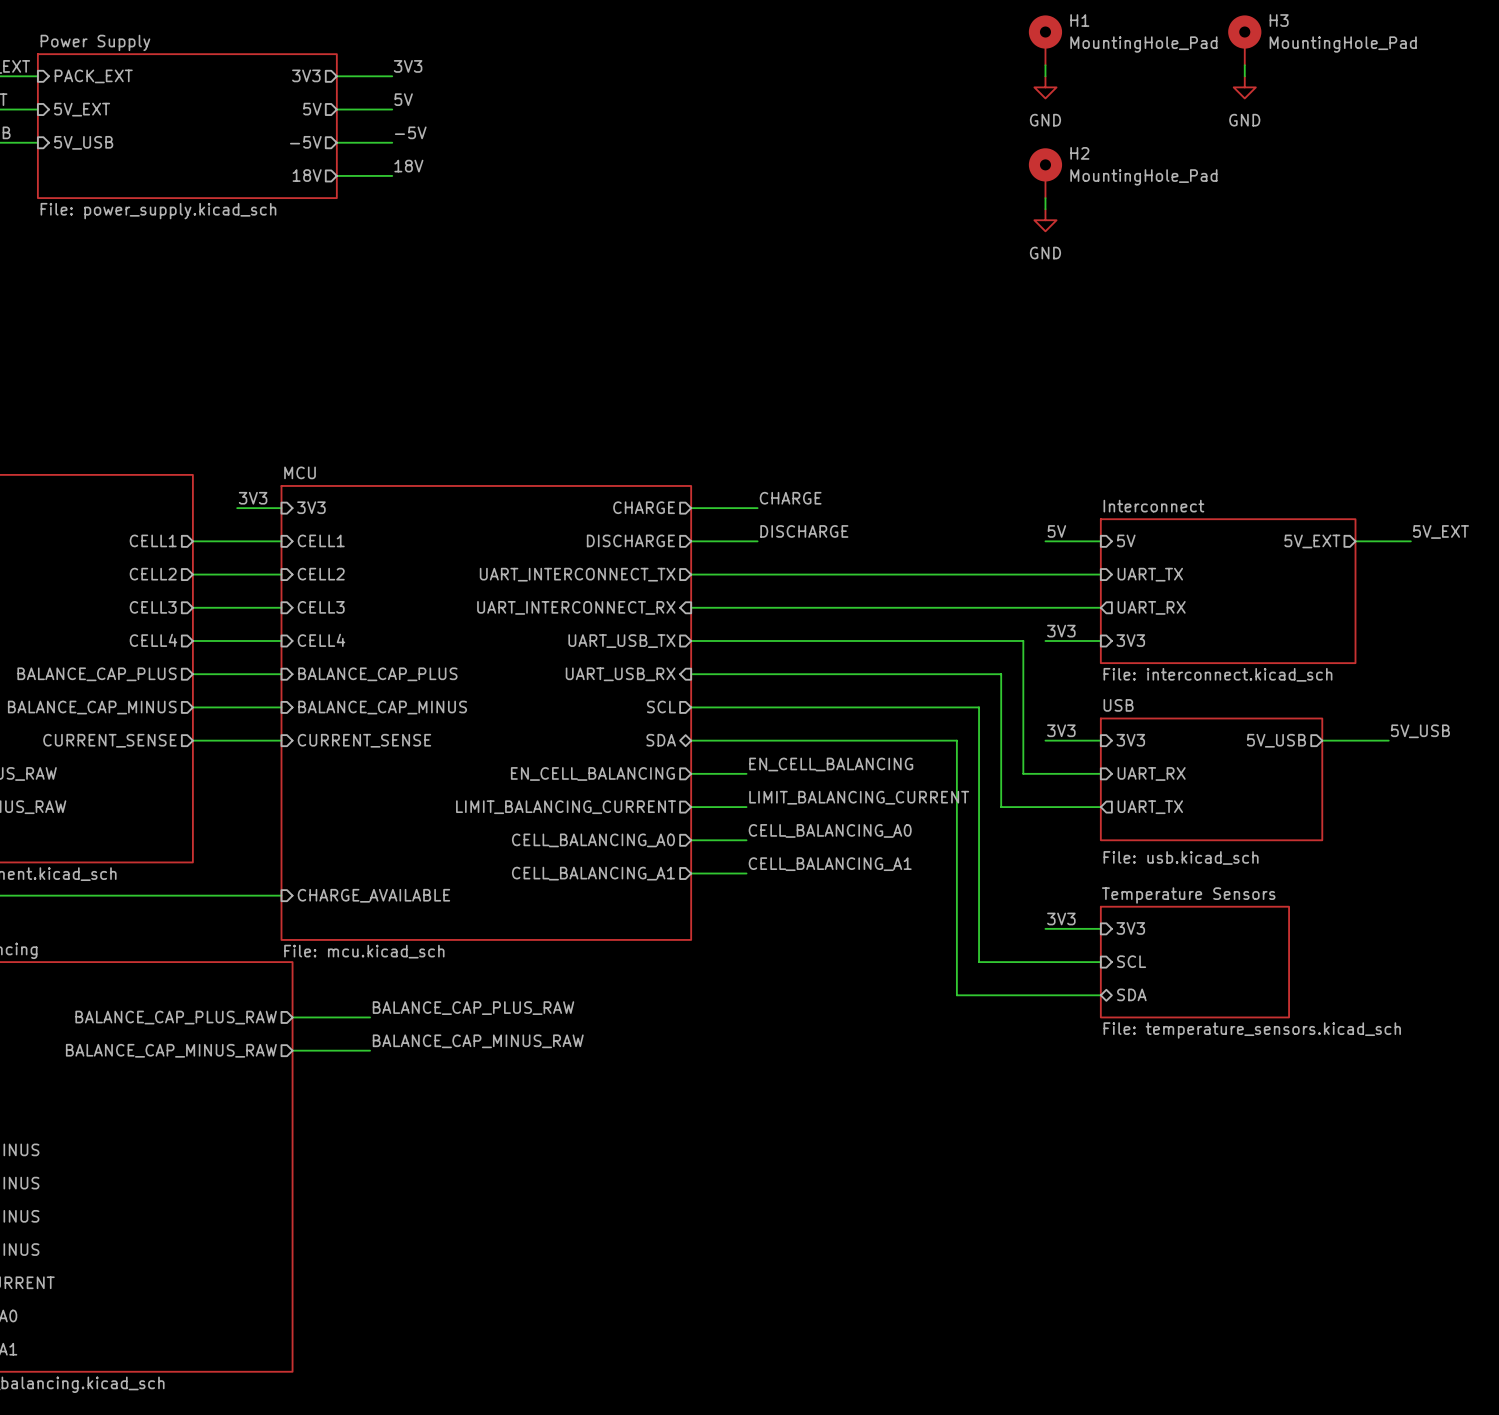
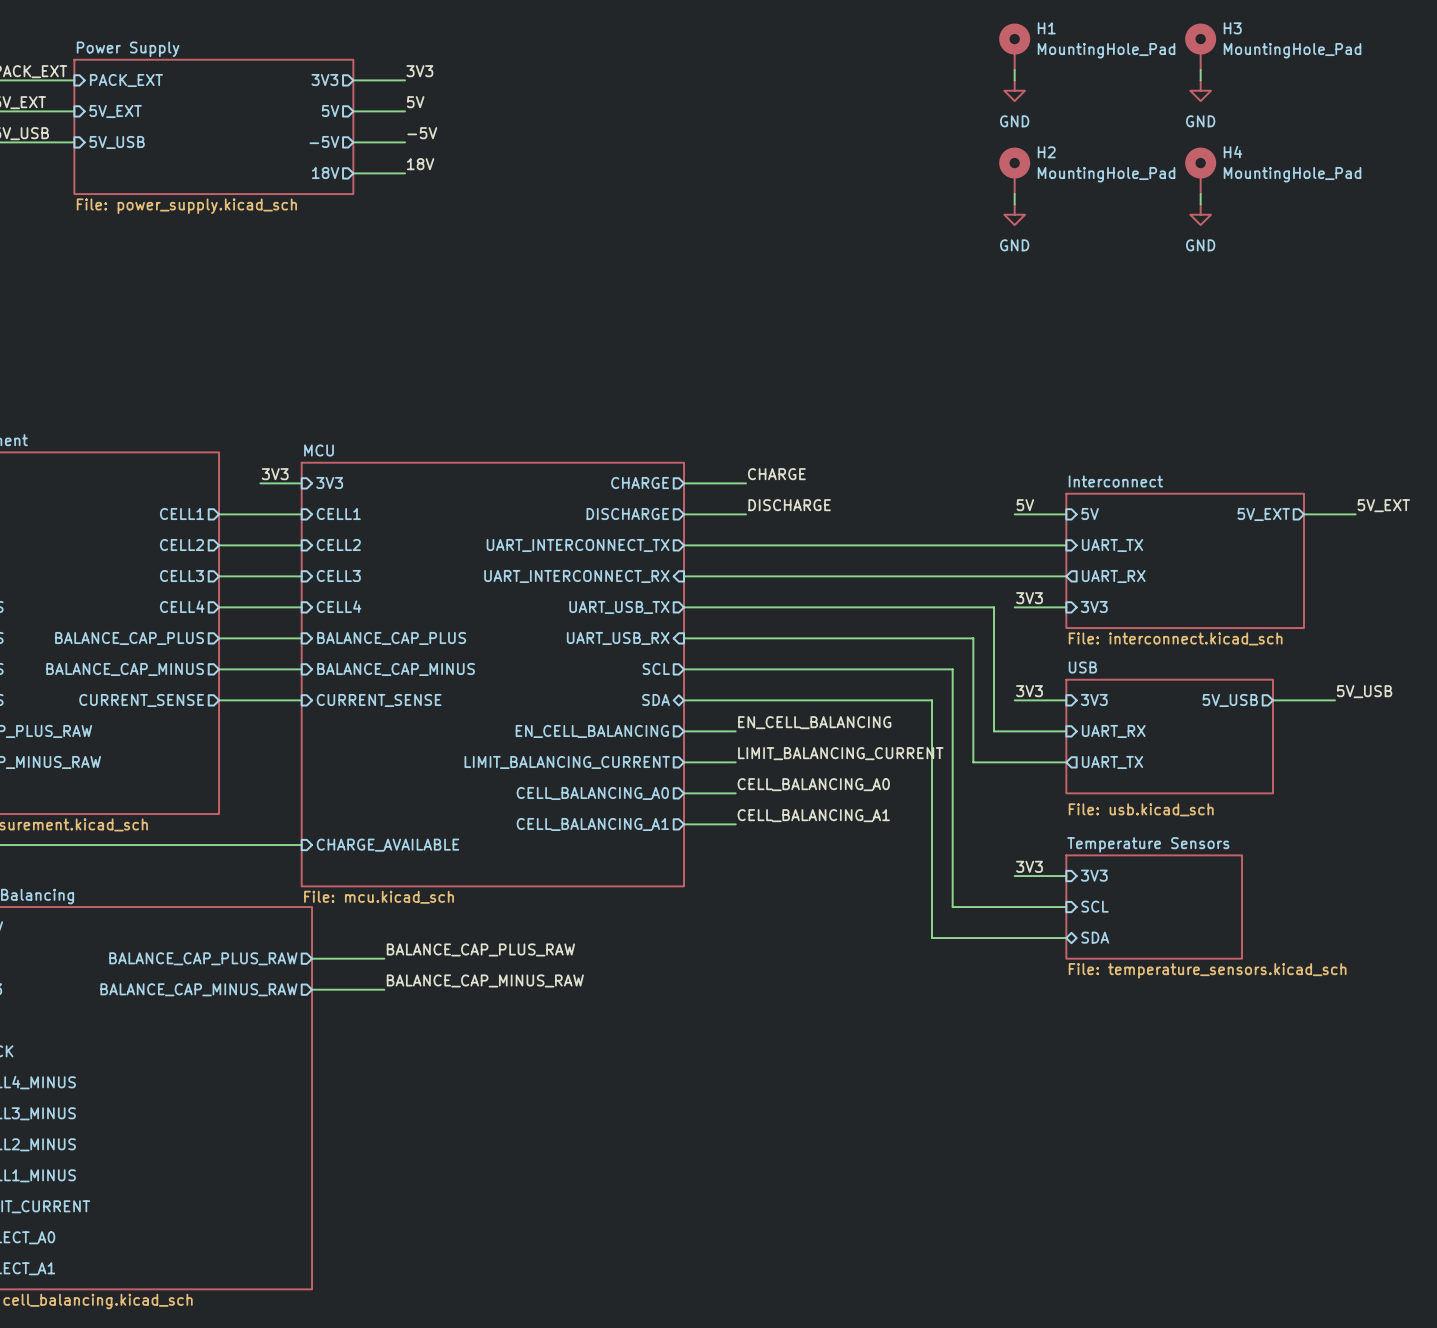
H4: none -> MountingHole_Pad (1200, 170)
wire: none -> (1200, 194) (1200, 204)
power symbol: none -> GND (1200, 214)

